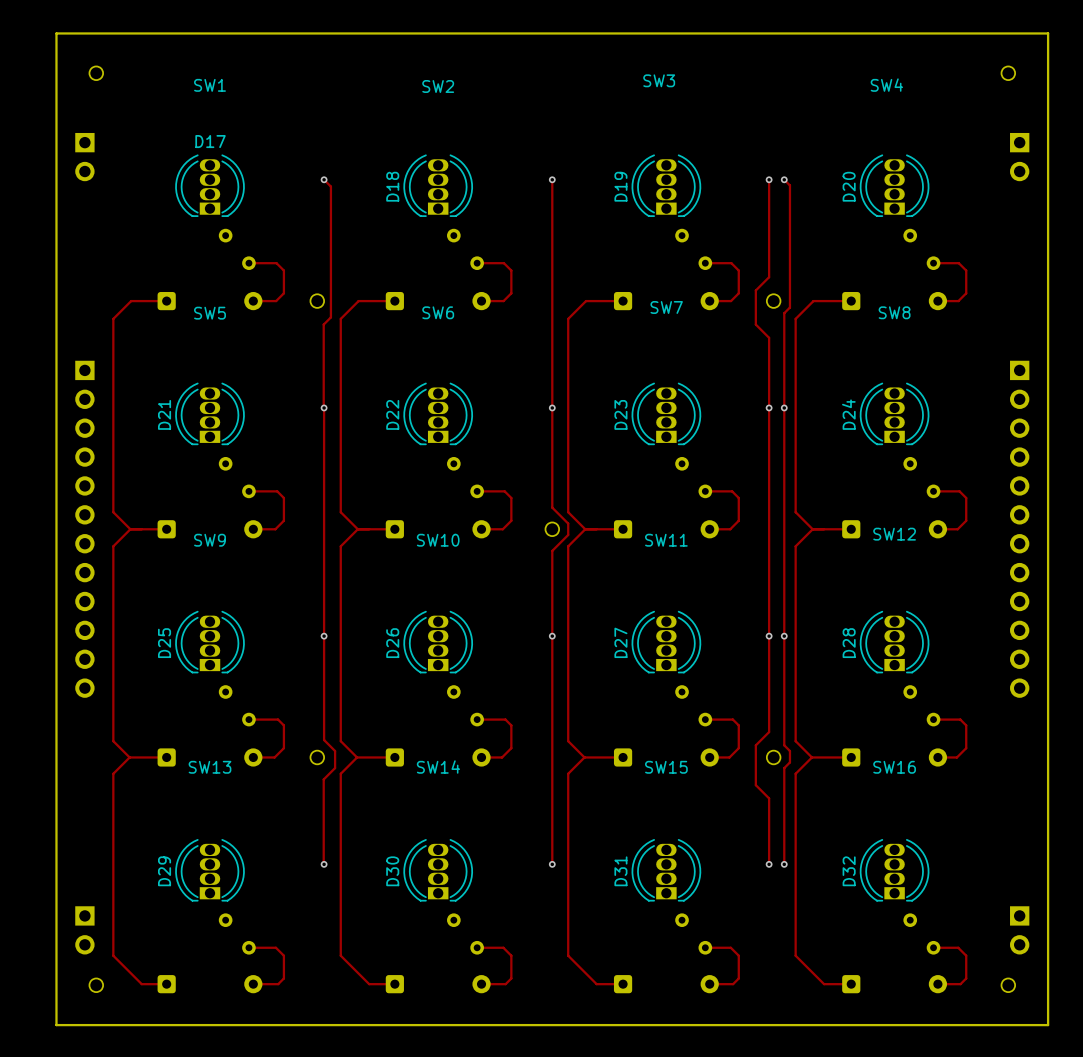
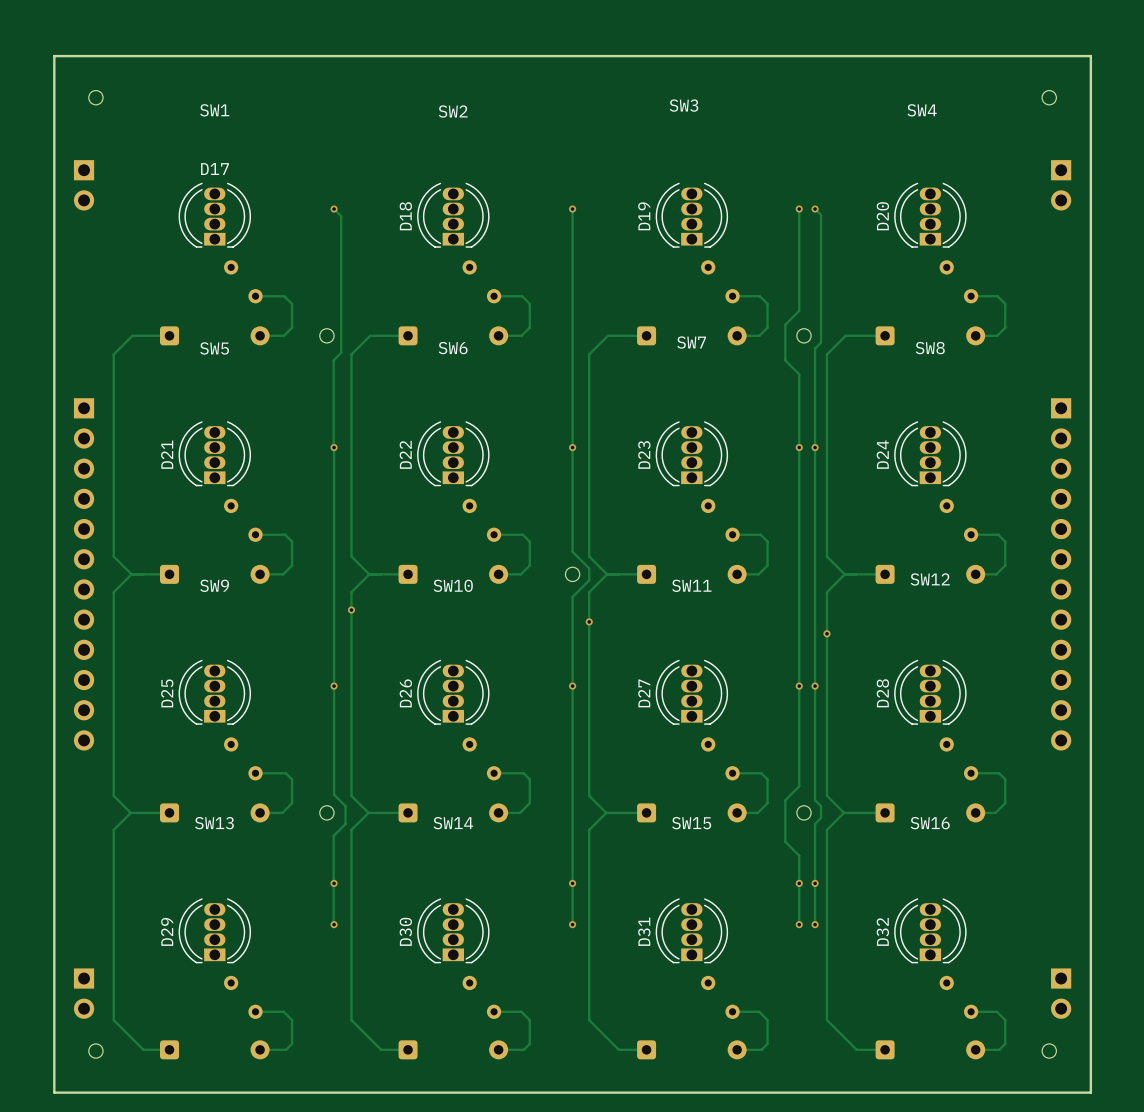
via: none -> (351, 610)
via: none -> (589, 621)
via: none -> (826, 633)
via: none -> (334, 883)
via: none -> (572, 883)
via: none -> (799, 883)
via: none -> (815, 883)

